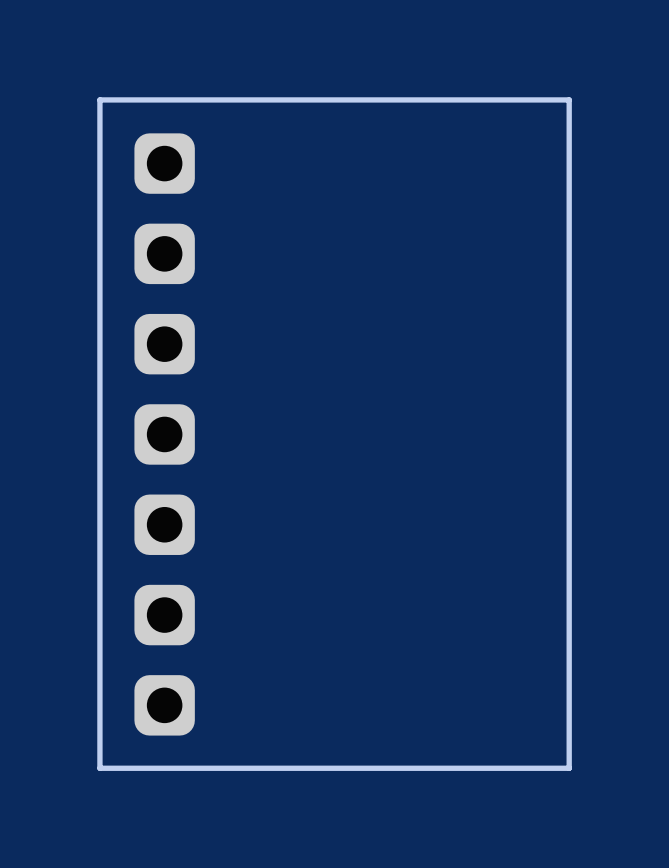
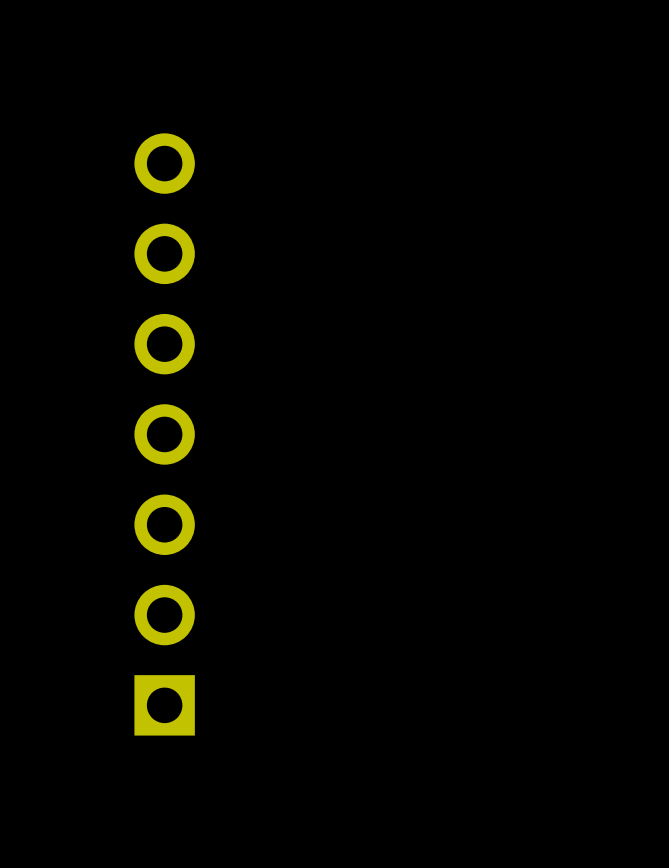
board edge: (569, 99) (569, 768) (99, 768) (99, 99) (569, 99) -> none
part footprint: [134, 133, 195, 736] -> [134, 133, 195, 736]

